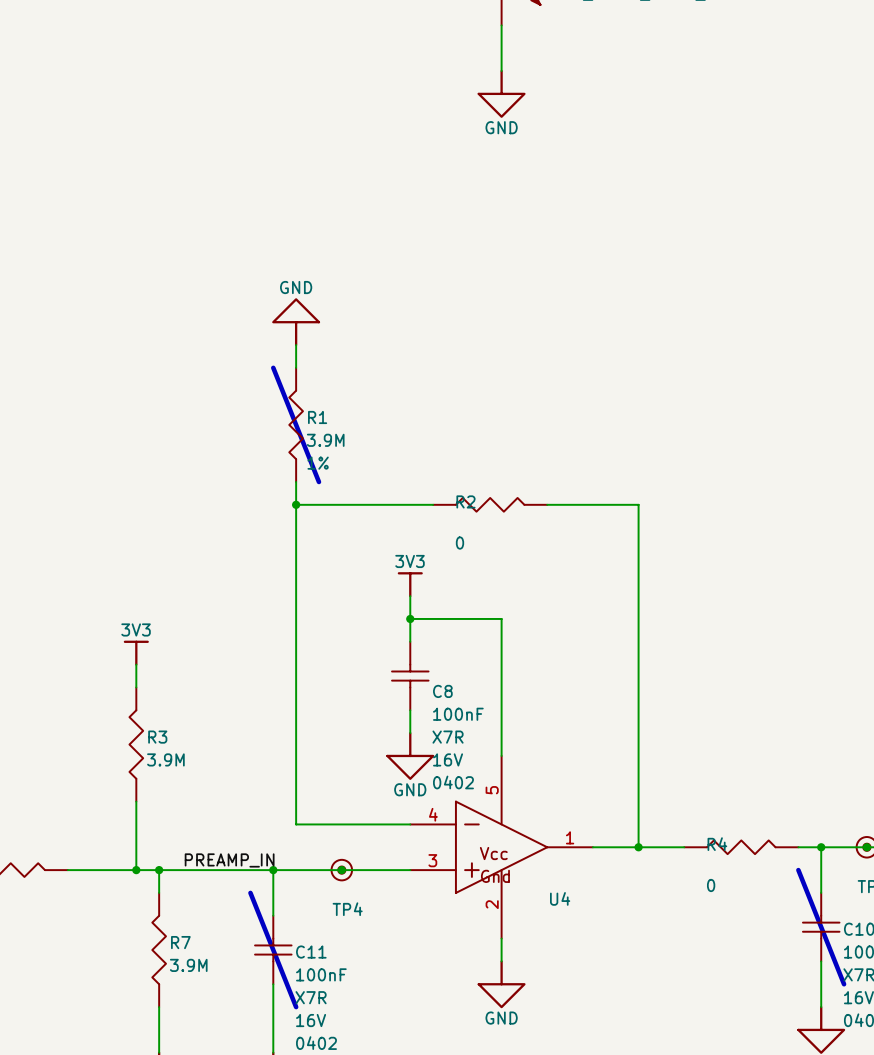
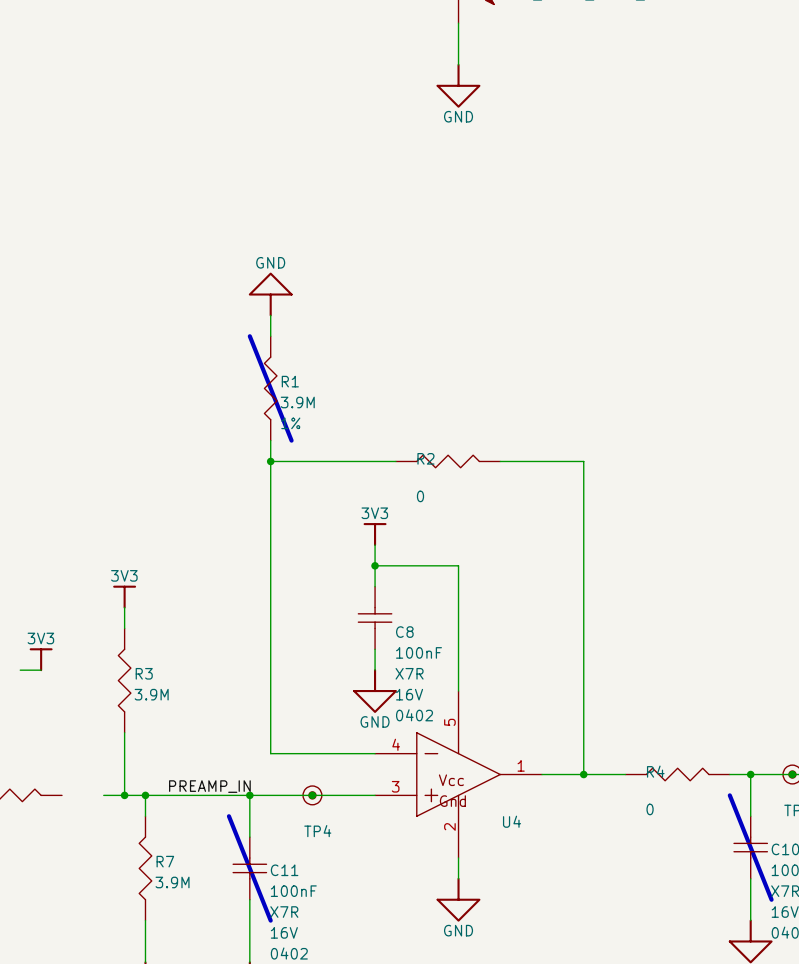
power symbol: none -> 3V3 (41, 659)
wire: none -> (20, 670) (41, 670)
wire: (67, 870) (113, 870) -> none

